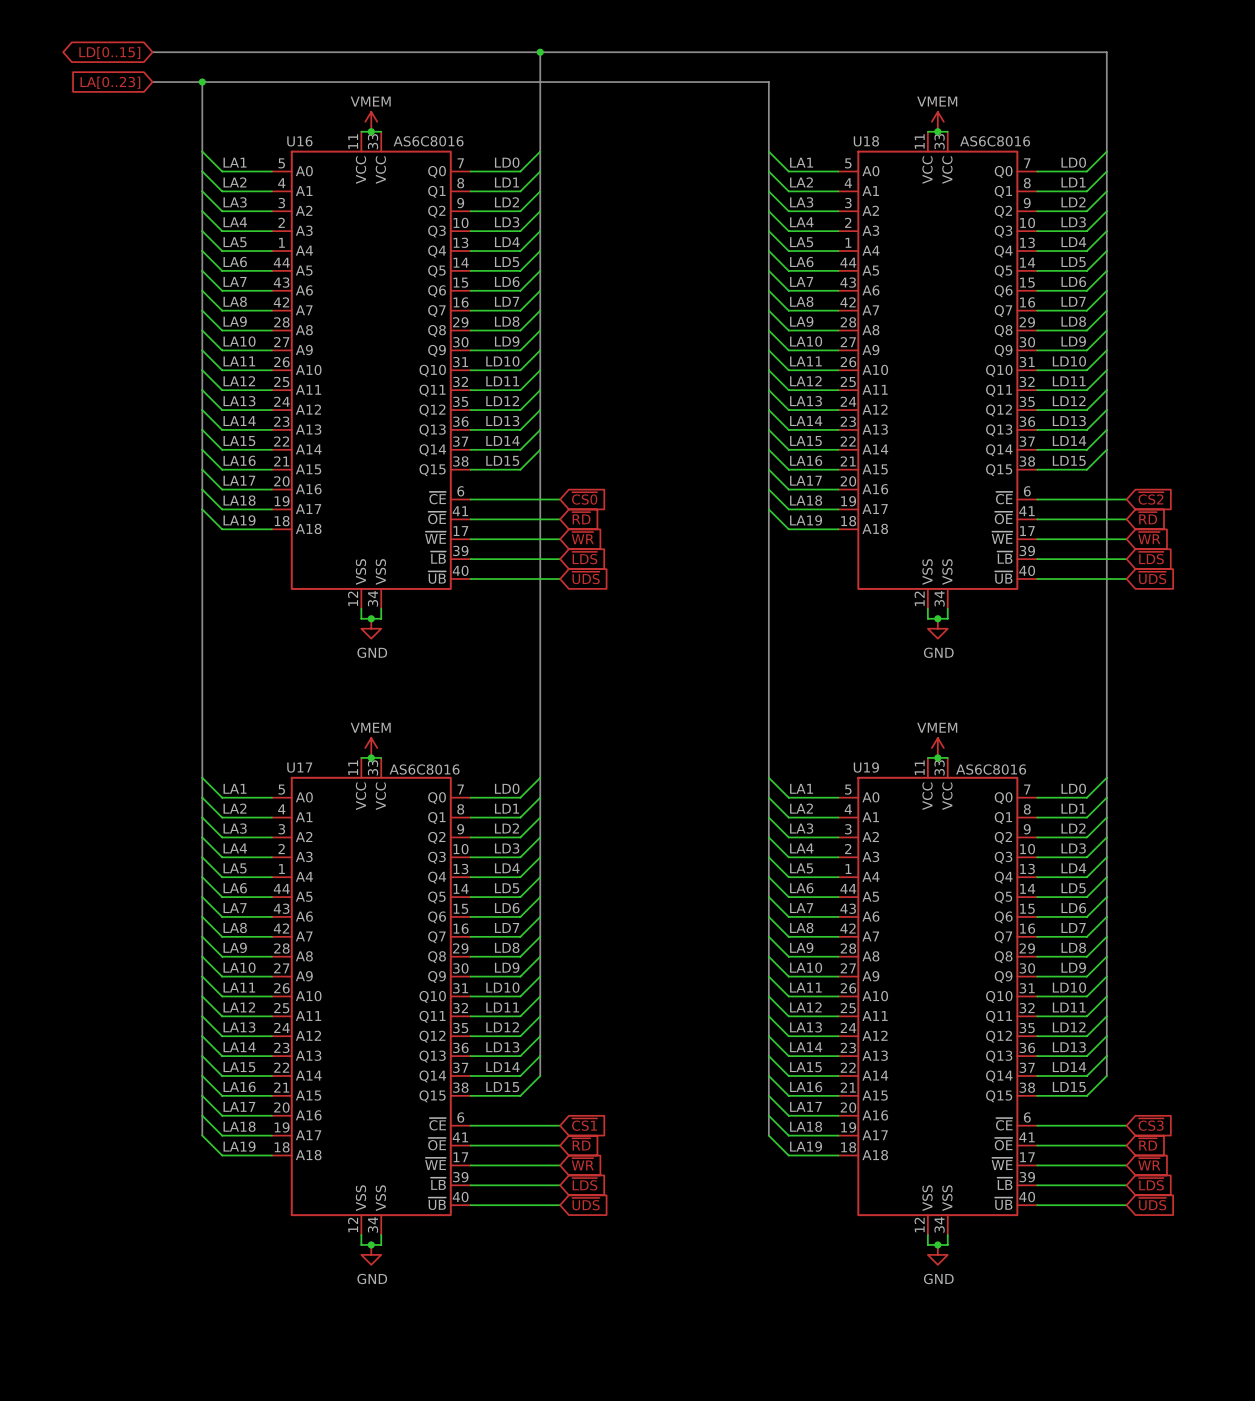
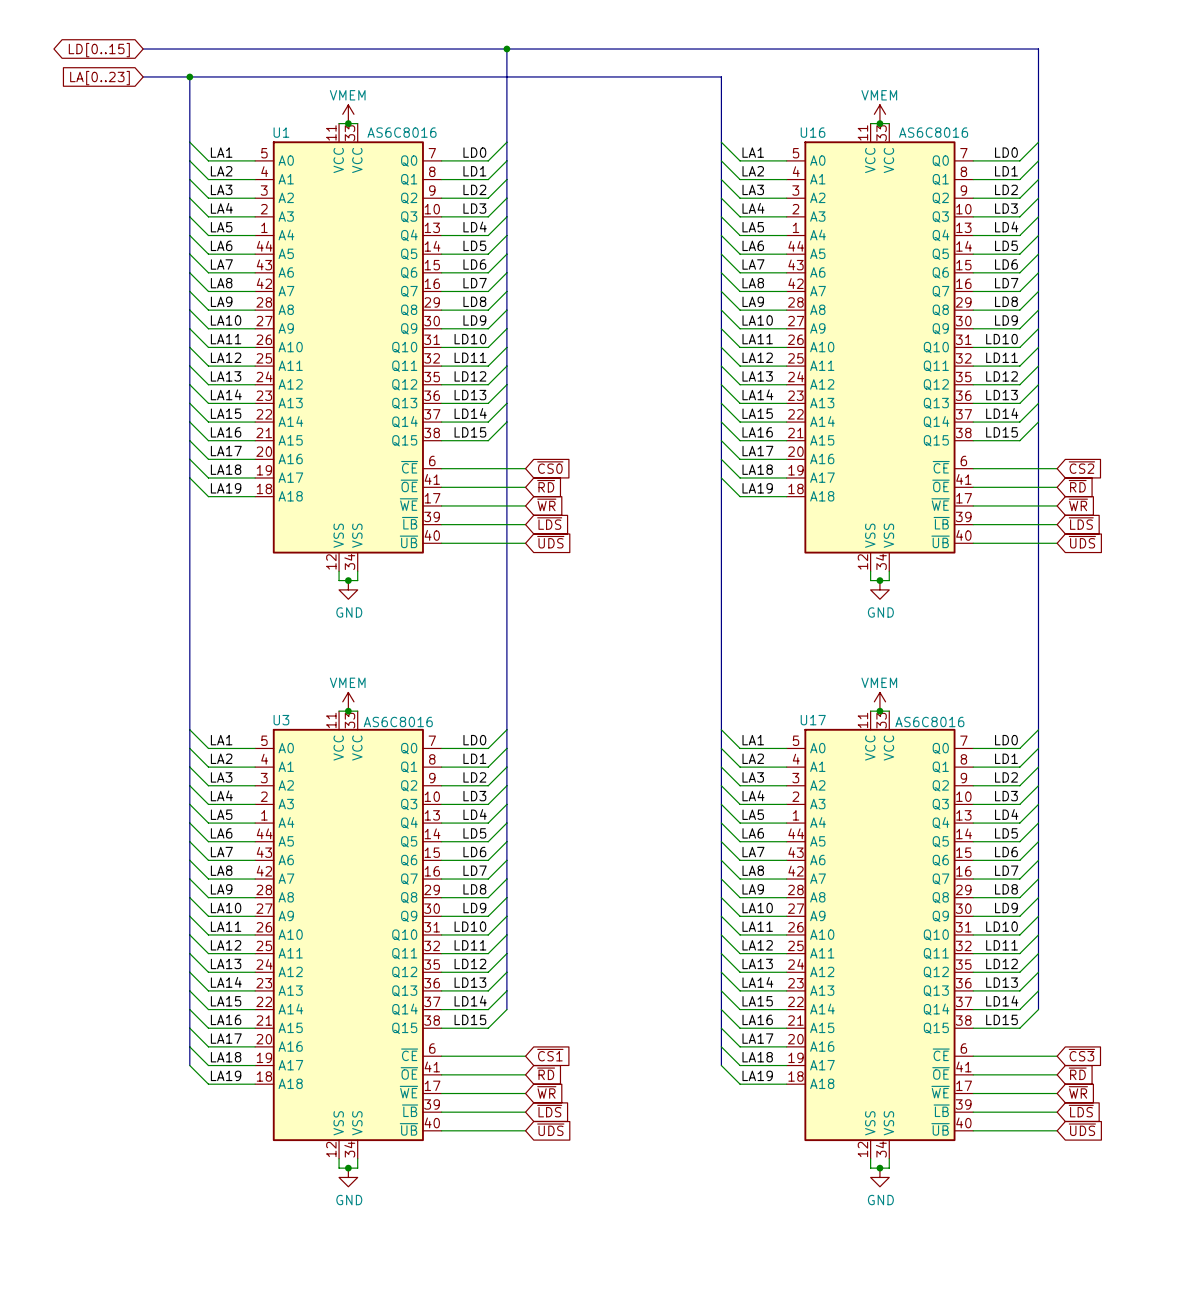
U16 name: U16 (299, 141) -> U1 (281, 132)
U18 name: U18 (866, 141) -> U16 (813, 132)
U17 name: U17 (299, 767) -> U3 (281, 720)
U19 name: U19 (866, 767) -> U17 (813, 720)

